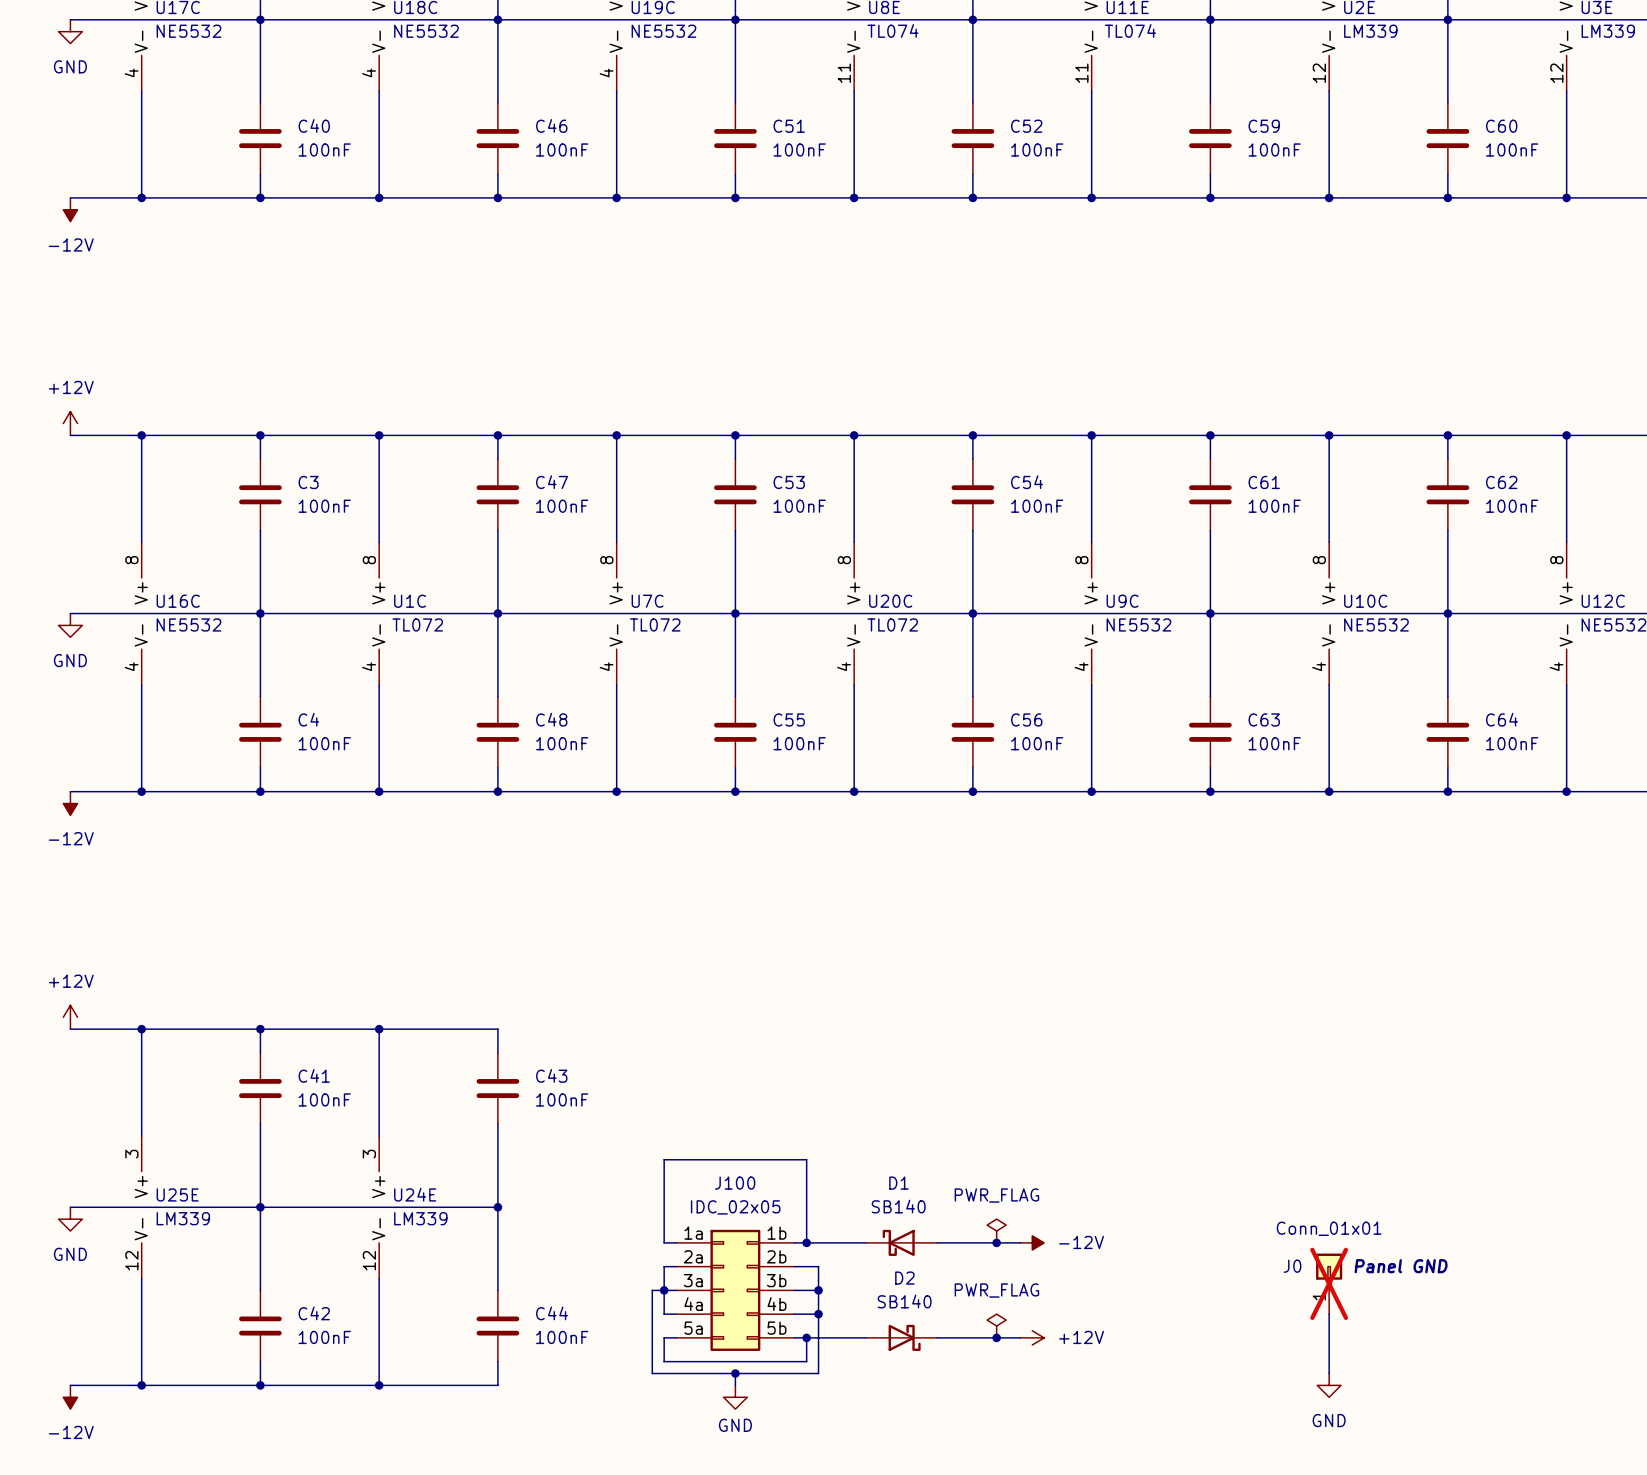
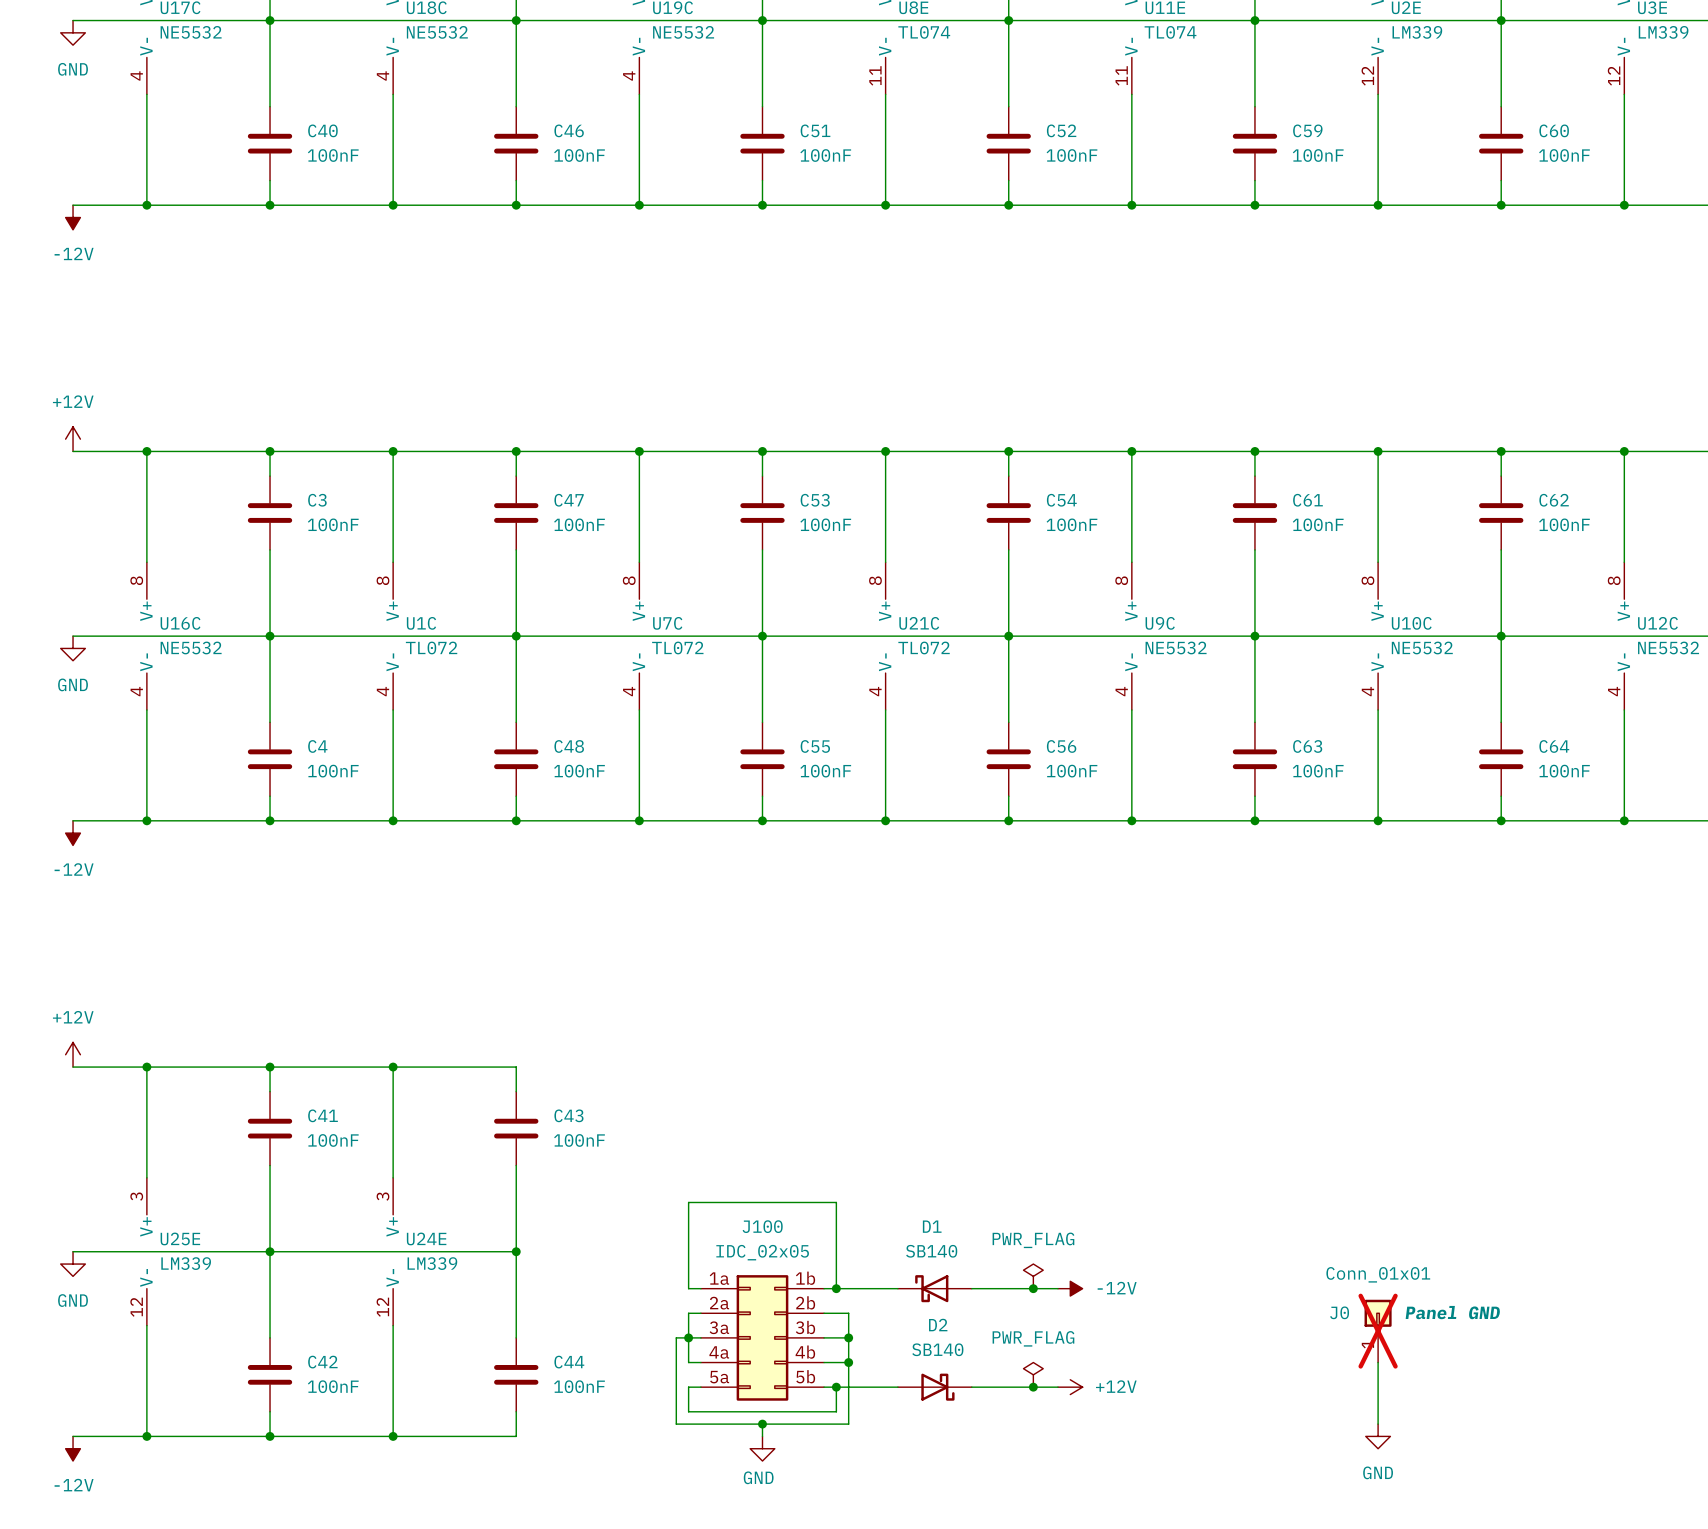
U20C name: U20C (890, 601) -> U21C (919, 623)

